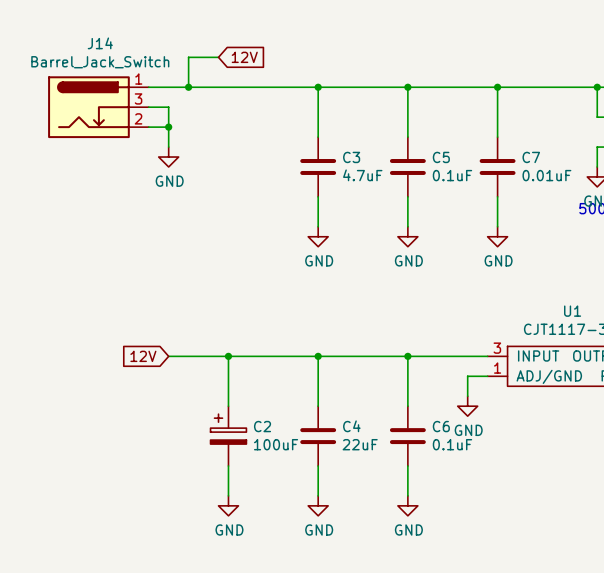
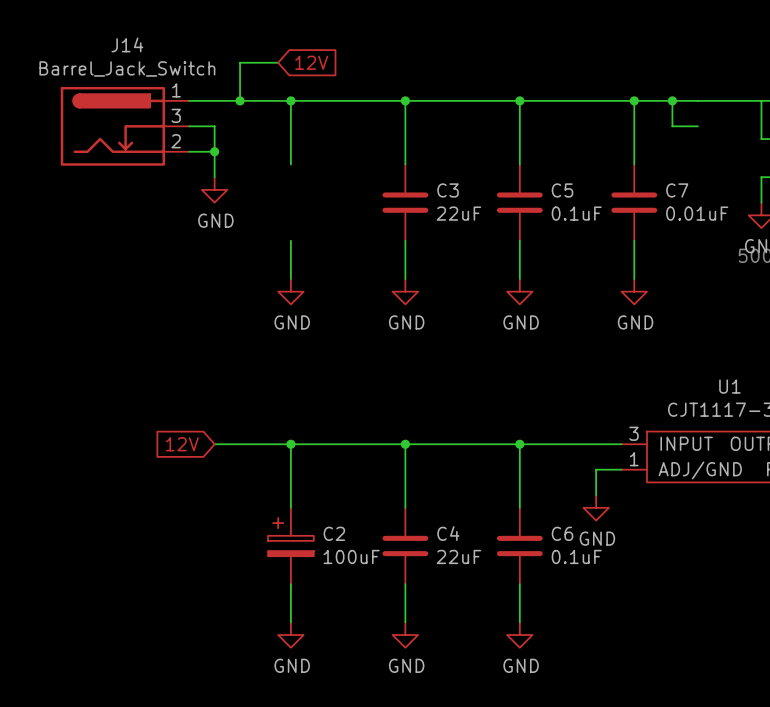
wire: none -> (290, 100) (290, 164)
junction: none -> (290, 100)
wire: none -> (672, 100) (672, 126) (697, 126)
junction: none -> (672, 100)
junction: (597, 87) -> none
C3 value: 4.7uF (362, 175) -> 22uF (458, 213)
wire: none -> (290, 240) (290, 278)
power symbol: none -> GND (290, 291)

